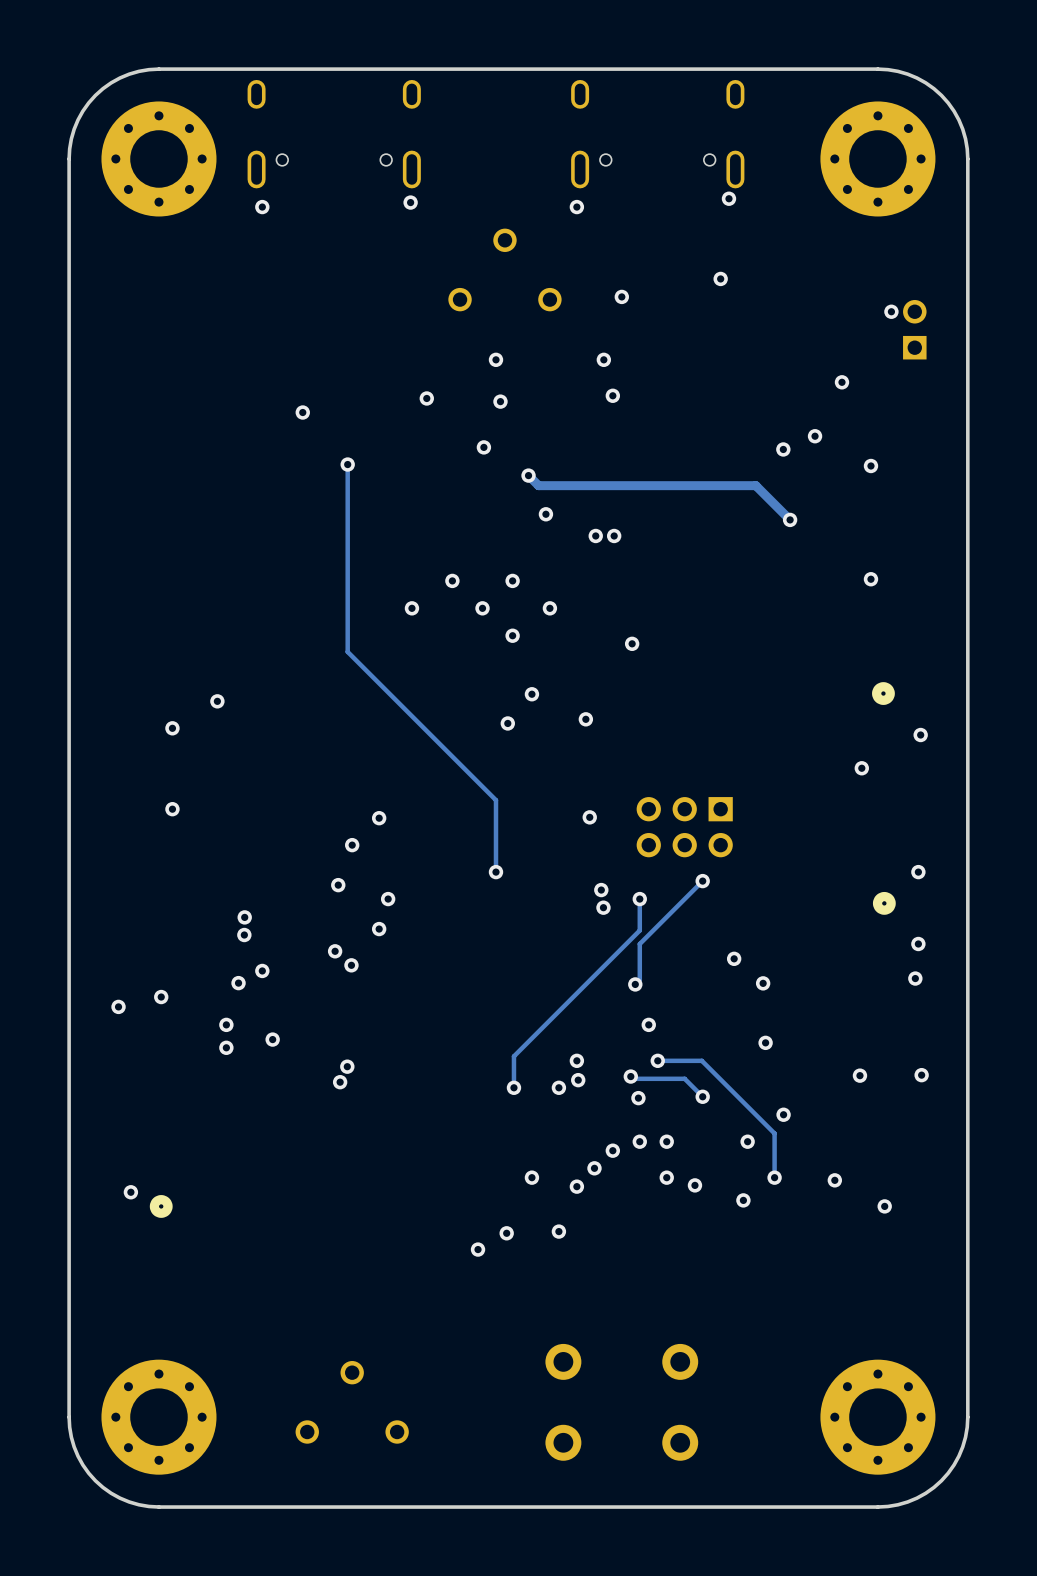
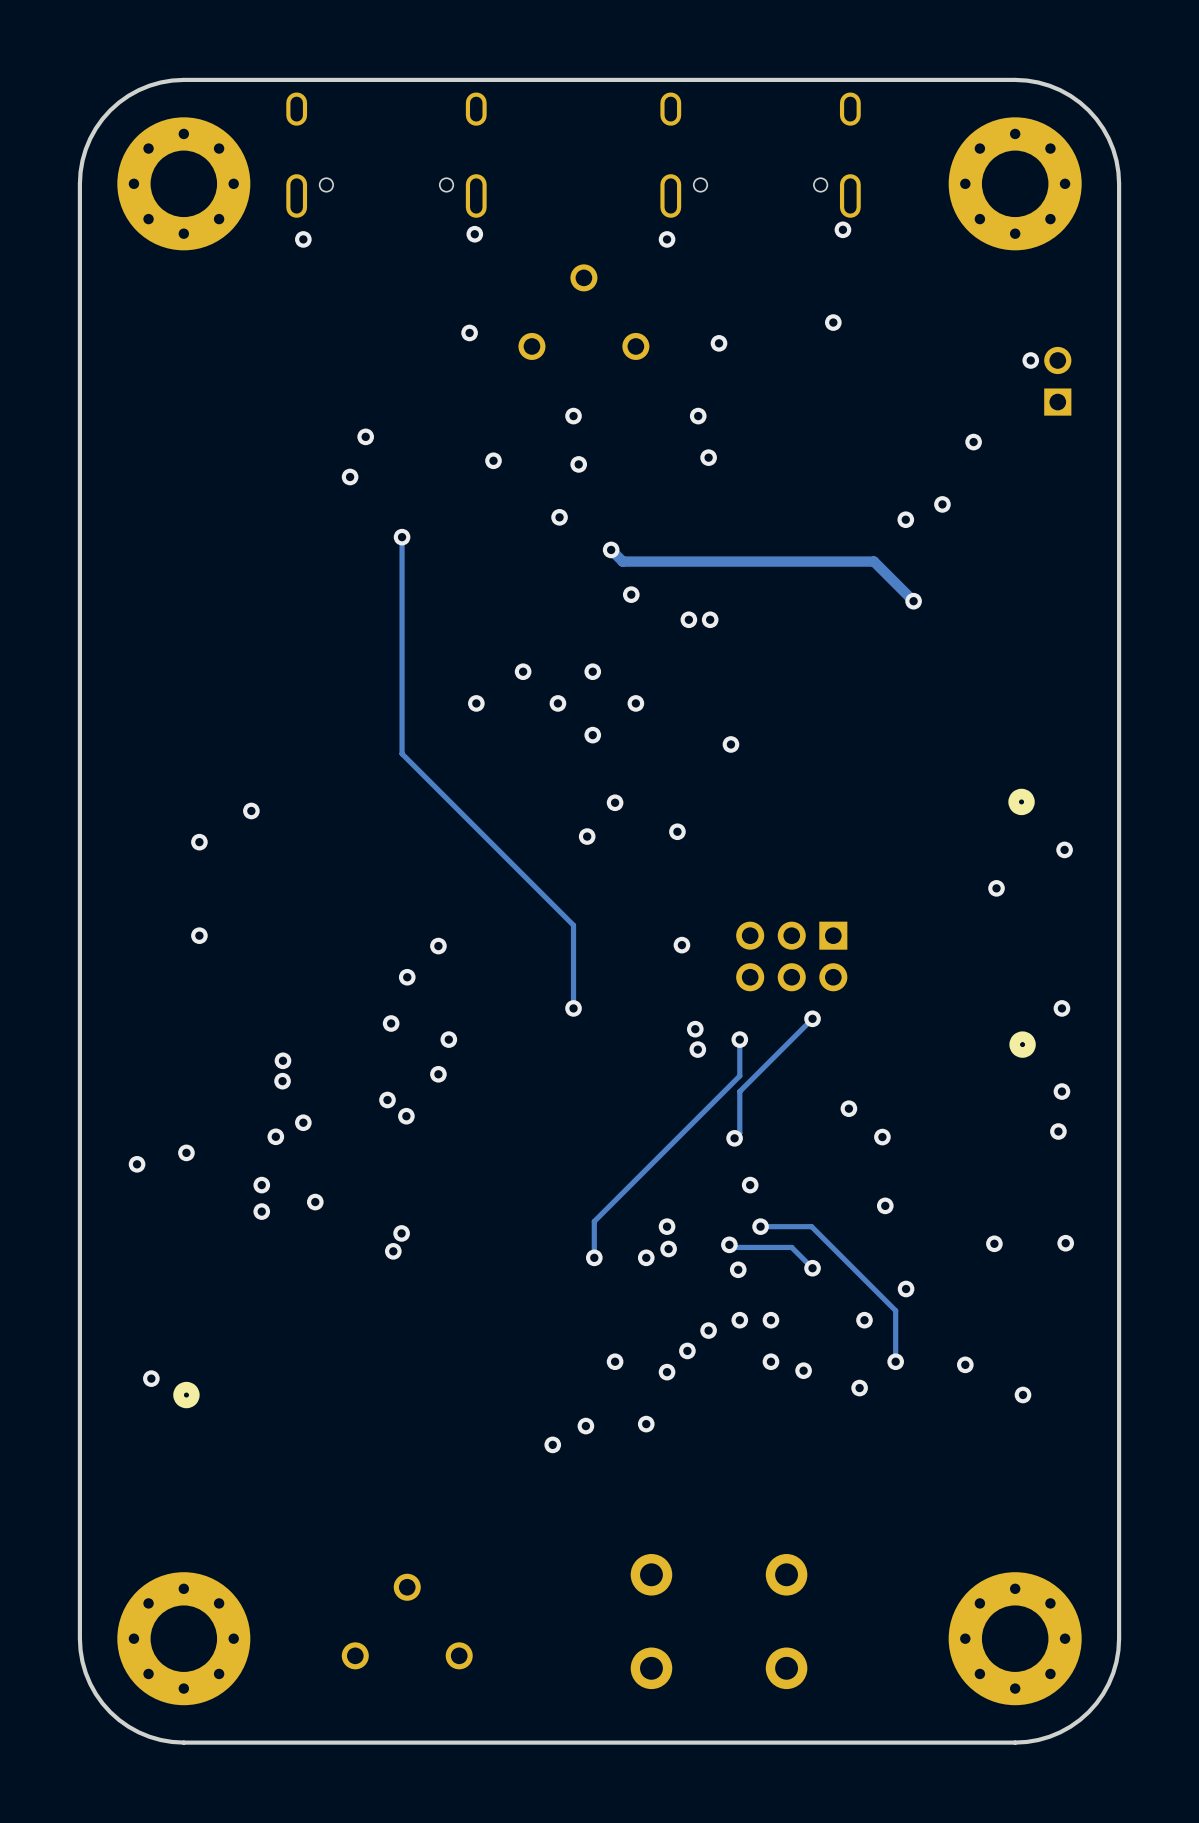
via: none -> (469, 332)
via: none -> (365, 436)
via: (870, 465) -> none
via: (870, 579) -> none

